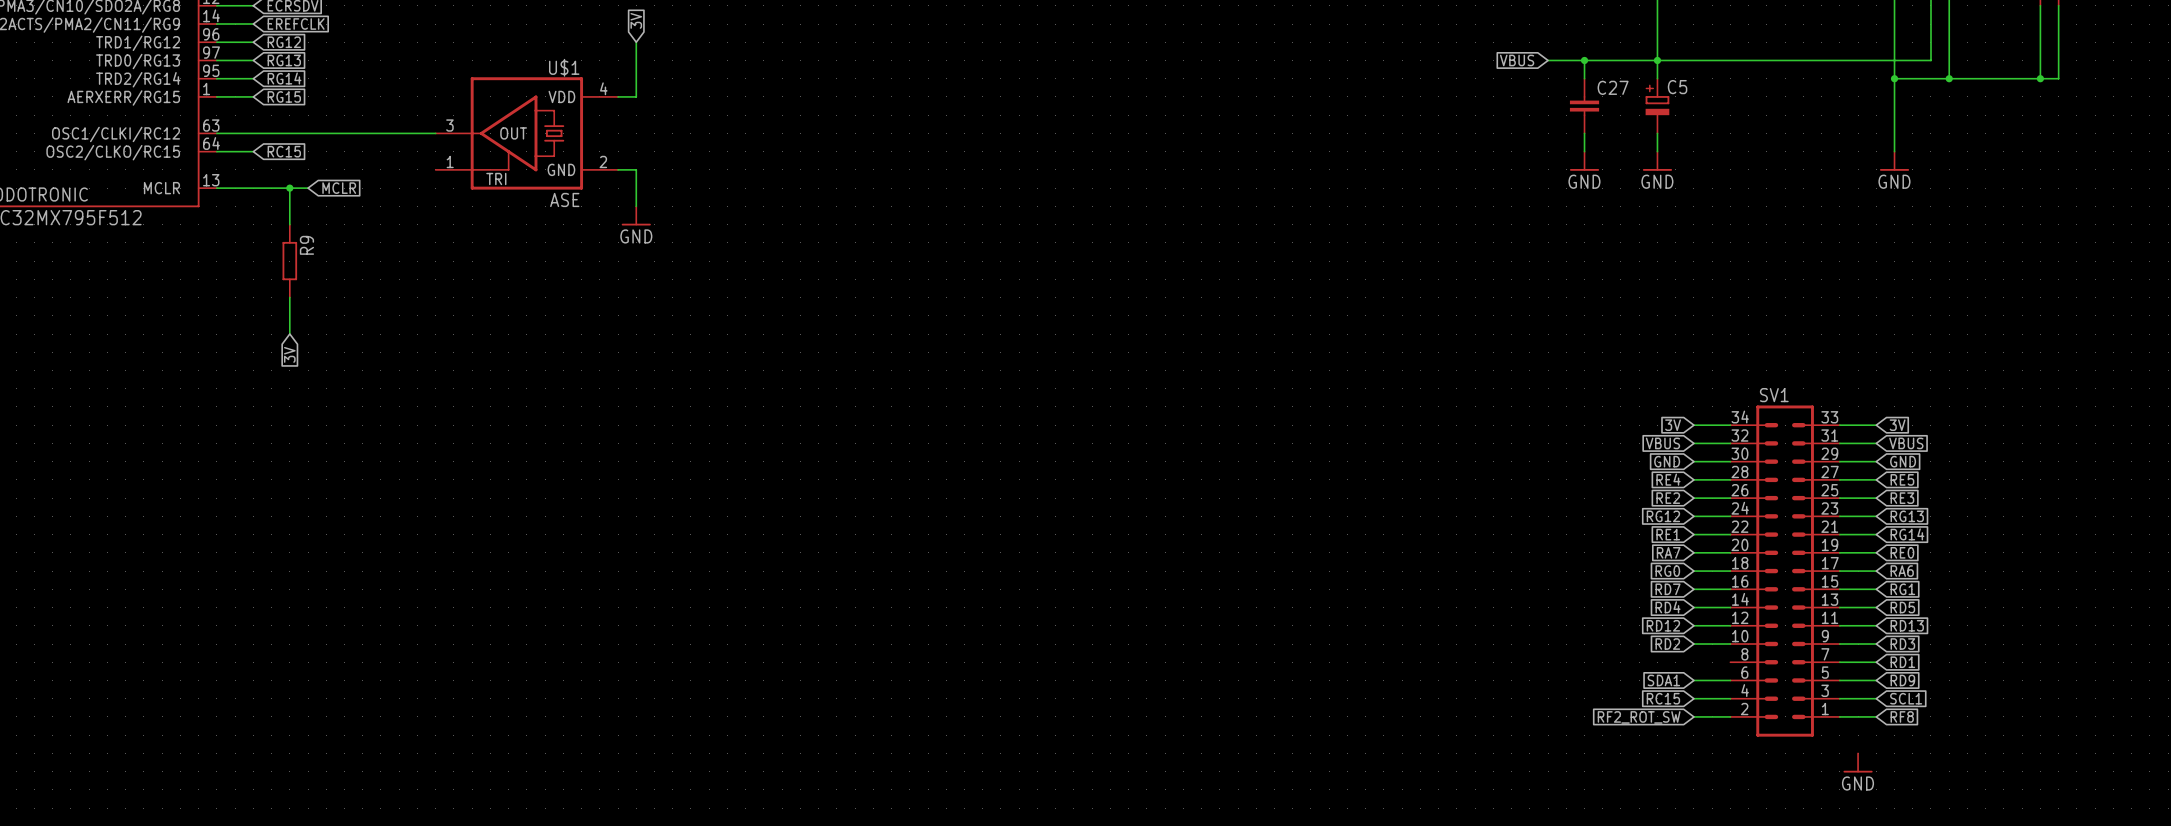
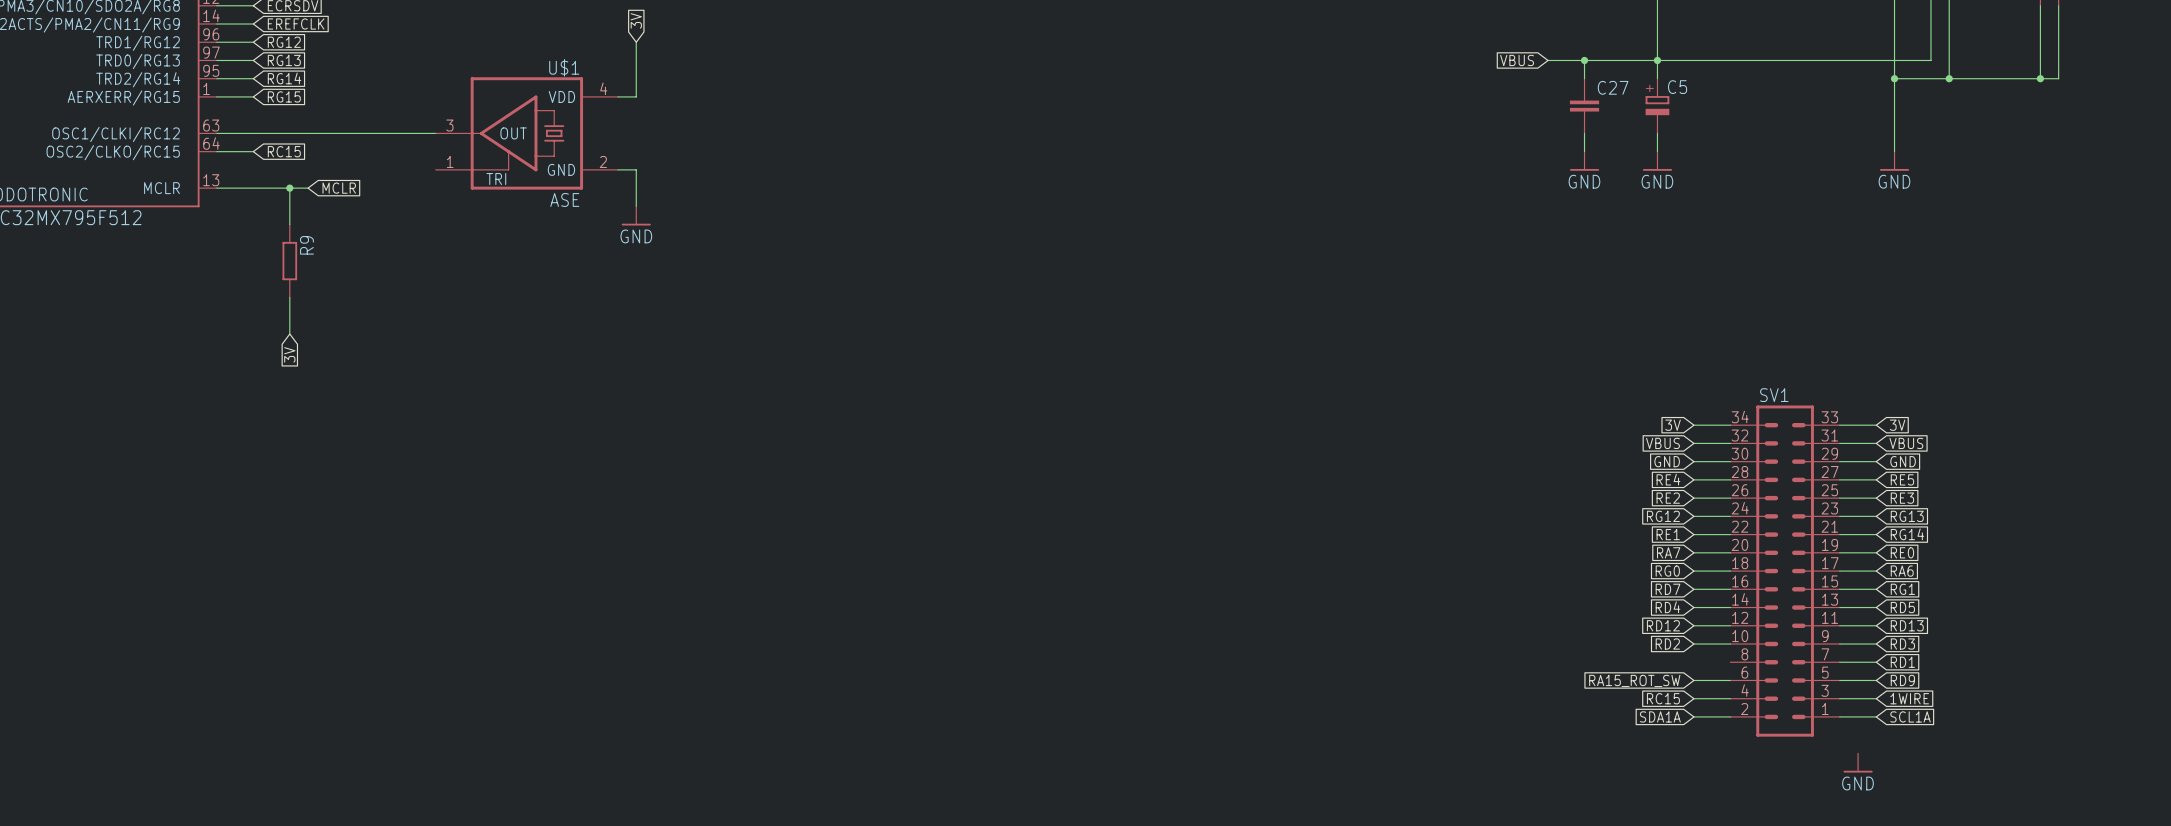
global label: SDA1 (1663, 680) -> RA15_ROT_SW (1634, 680)
global label: SCL1 (1906, 698) -> 1WIRE (1909, 698)
global label: RF8 (1902, 716) -> SCL1A (1910, 716)
global label: RF2_ROT_SW (1639, 717) -> SDA1A (1660, 716)

